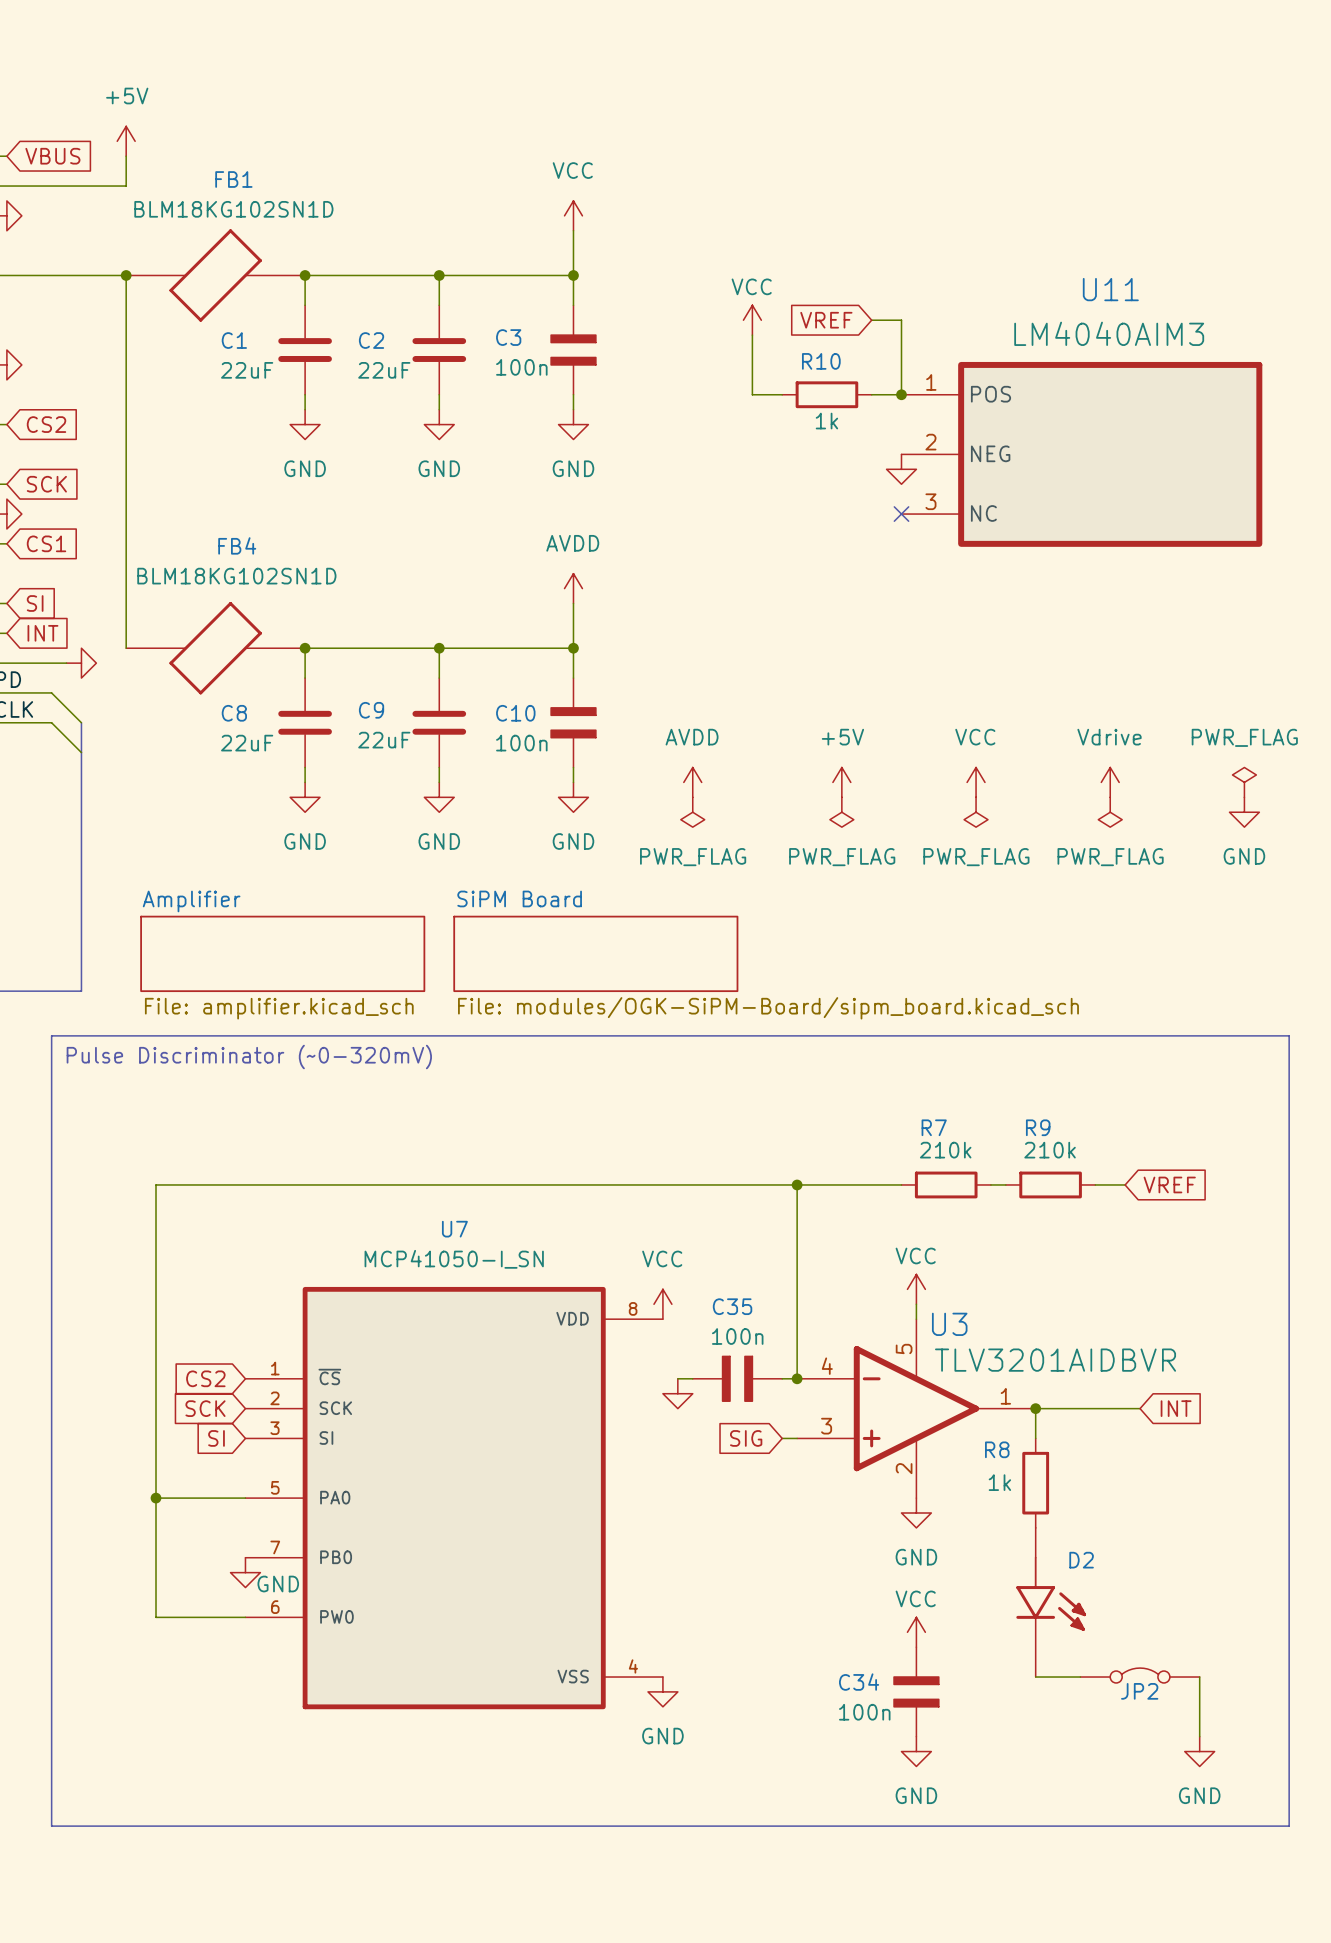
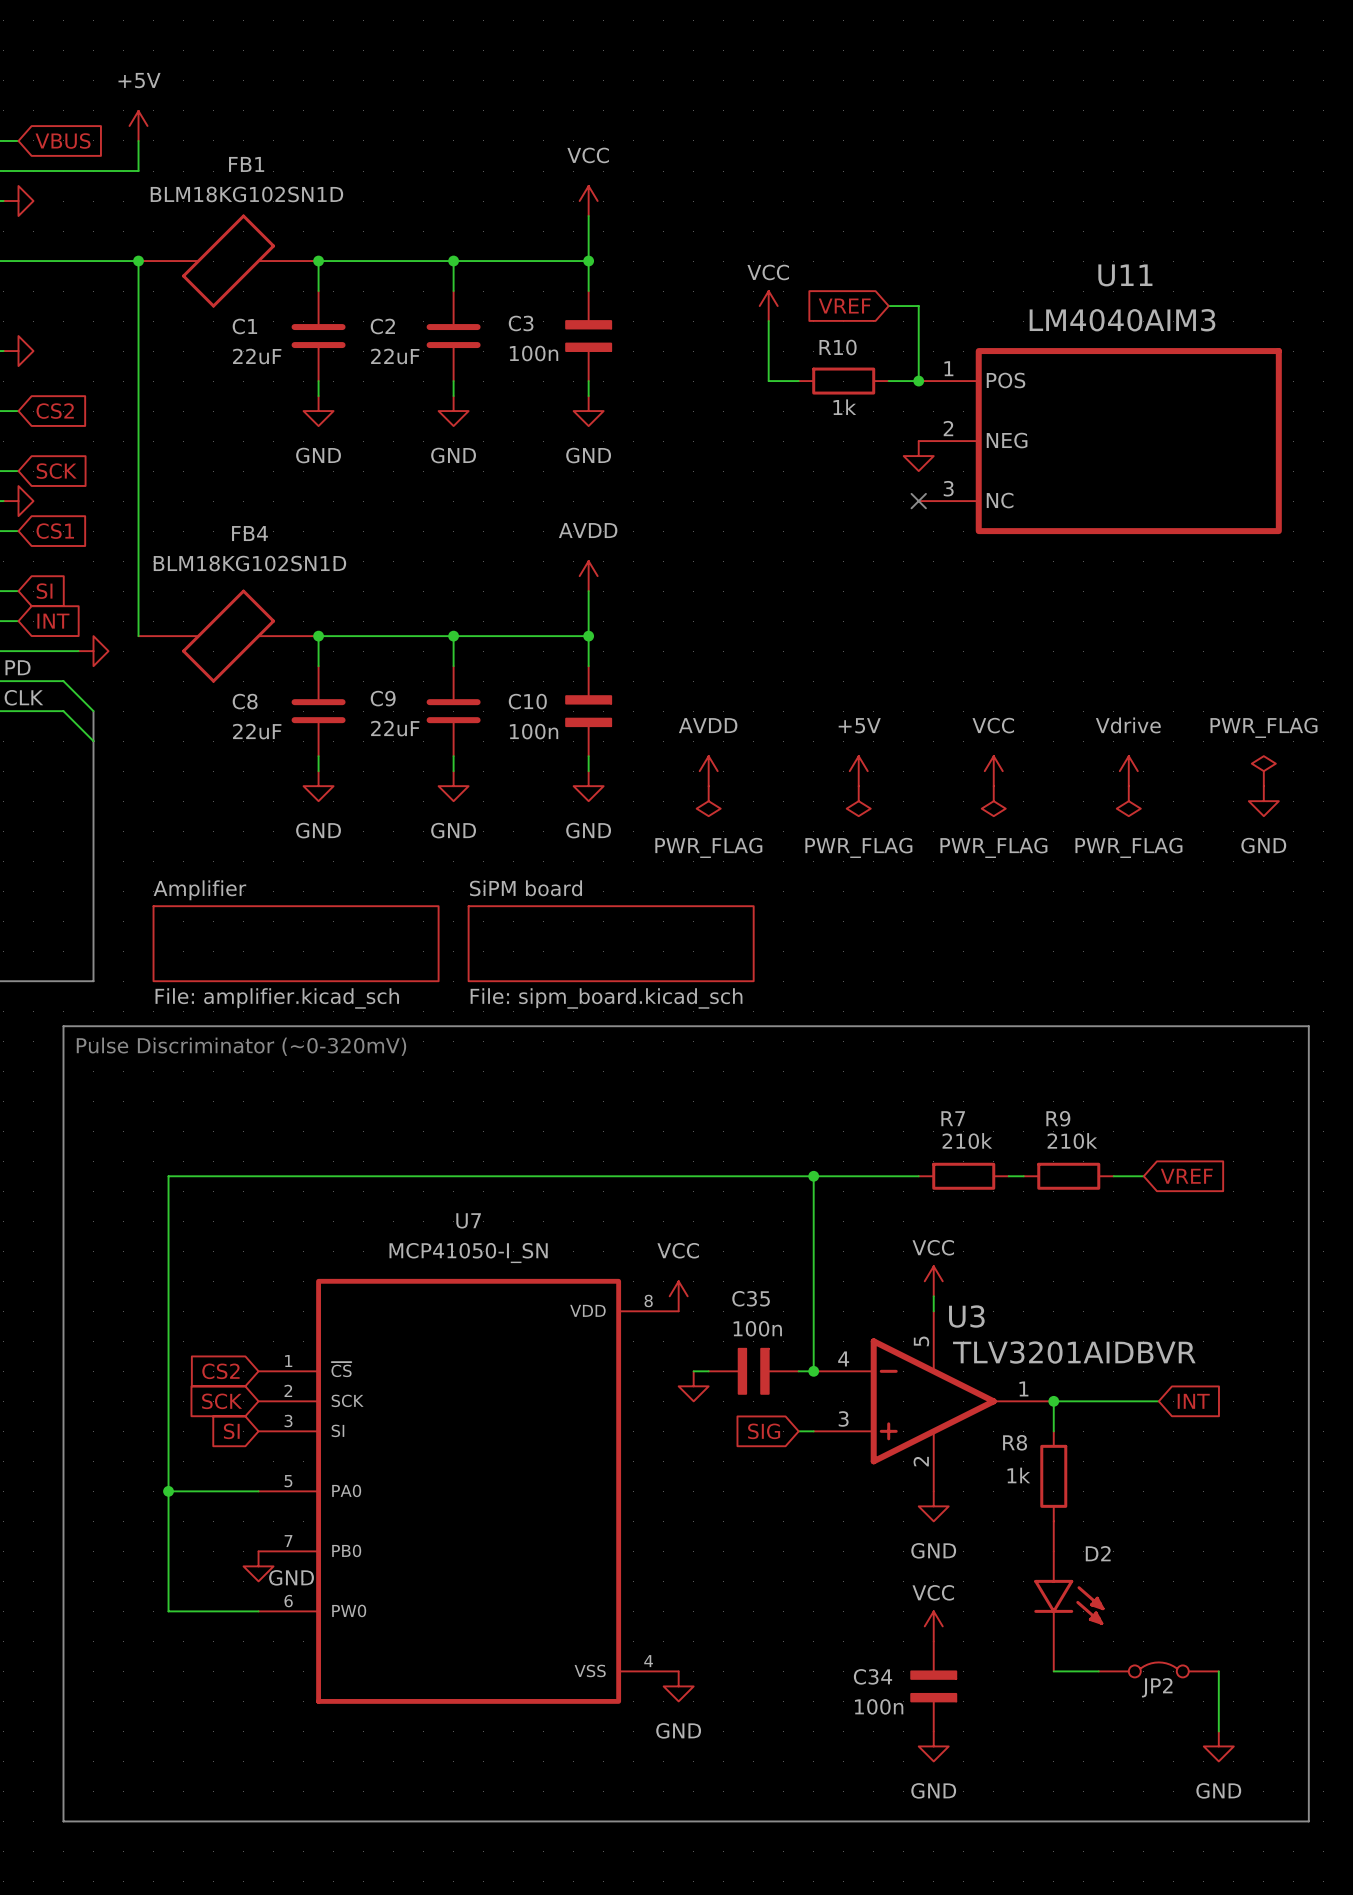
sheet SiPM Board name: SiPM Board (519, 898) -> SiPM board (525, 888)
sheet SiPM Board value: File: modules/OGK-SiPM-Board/sipm_board.kicad_sch (768, 1008) -> File: sipm_board.kicad_sch (606, 998)

